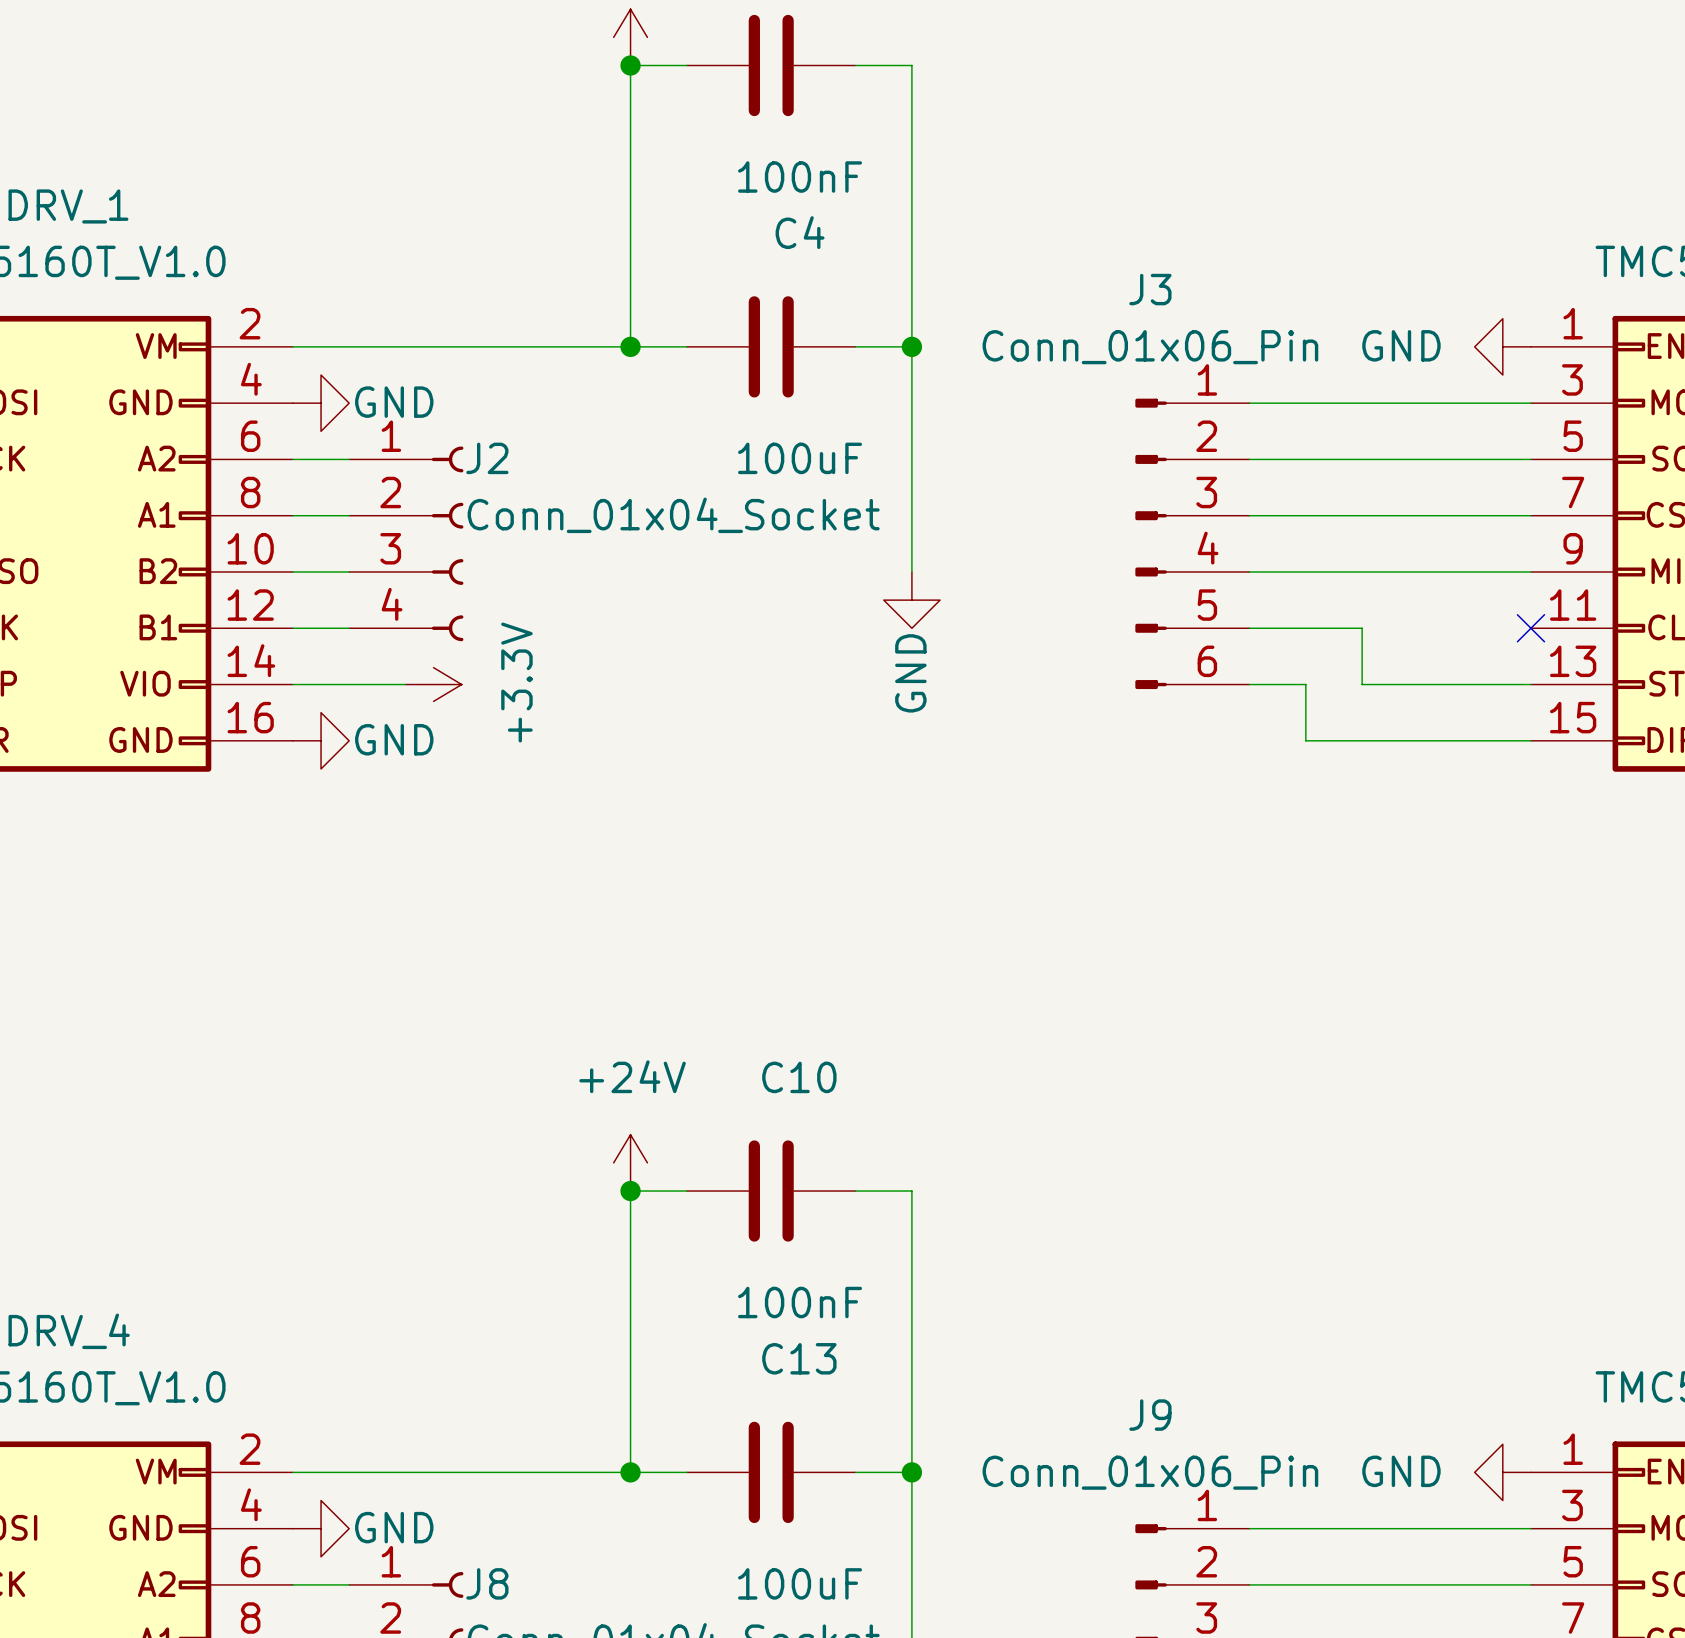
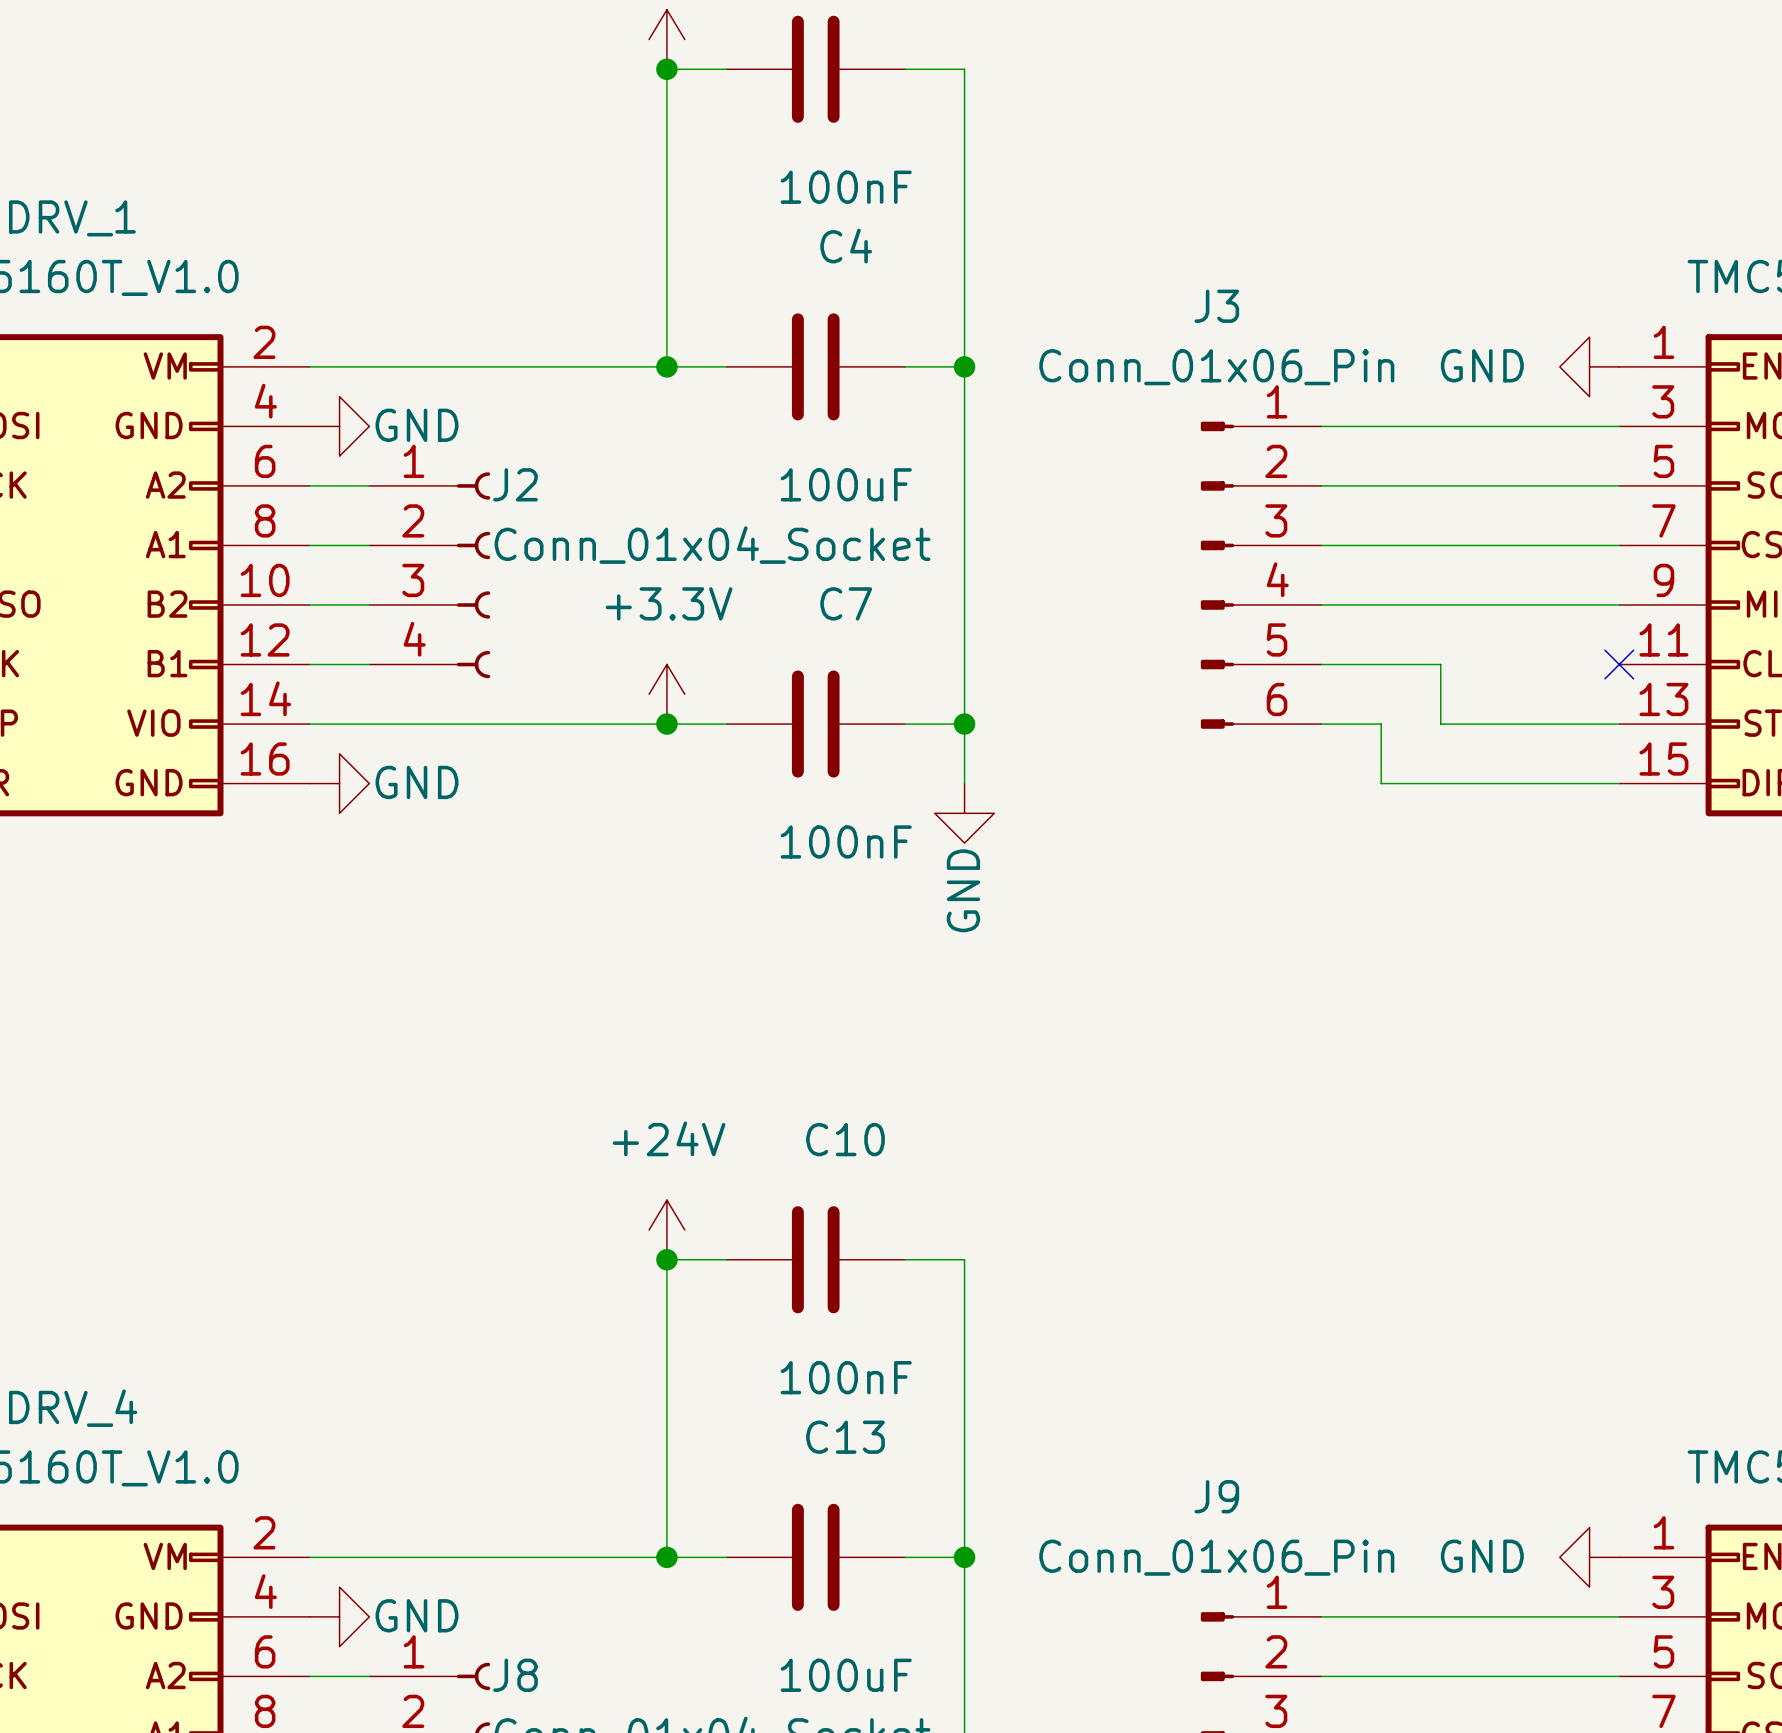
wire: none -> (964, 604) (964, 783)
power symbol position: GND (911, 600) -> GND (964, 813)
wire: none -> (428, 724) (726, 724)
power symbol rotation: 0° (433, 684) -> 90° counterclockwise (666, 694)
power symbol position: +3.3V (433, 684) -> +3.3V (666, 694)
junction: none -> (666, 724)
C7: none -> 100nF (815, 724)
wire: none -> (905, 724) (964, 724)
junction: none -> (964, 724)

